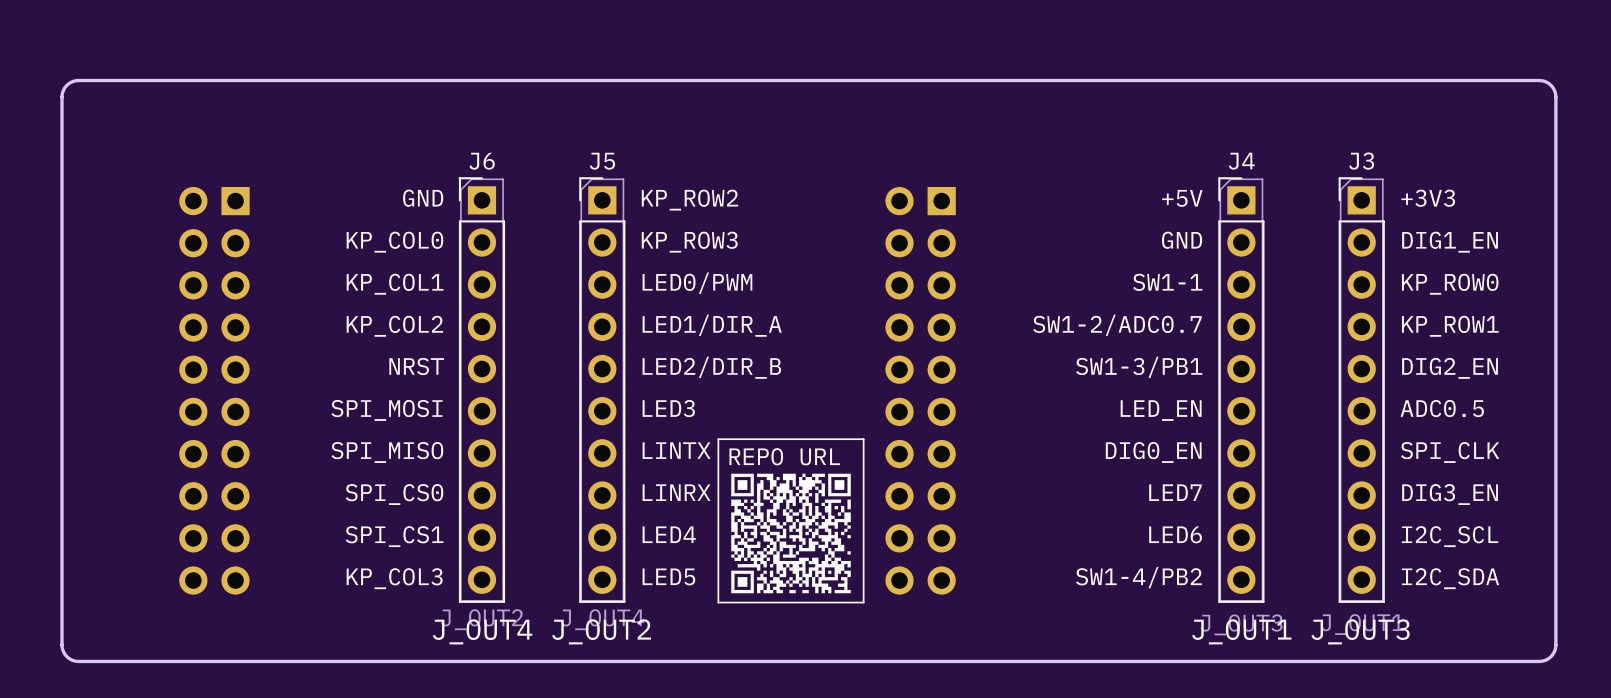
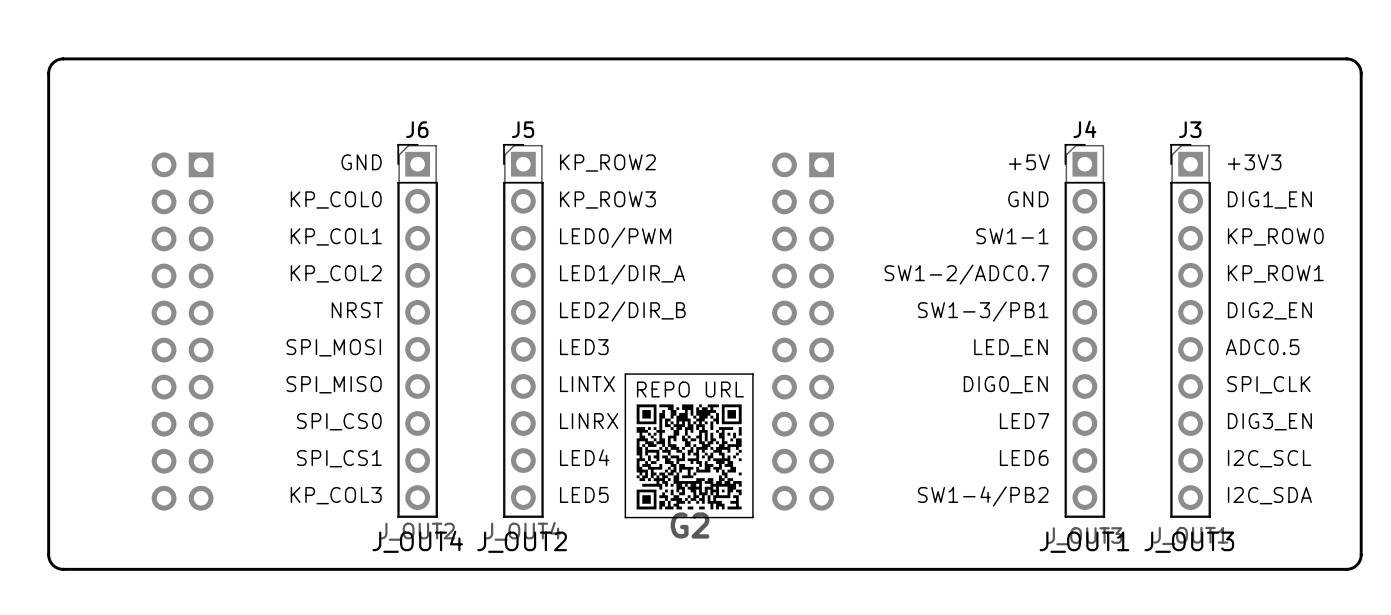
G2: none -> (689, 456)

